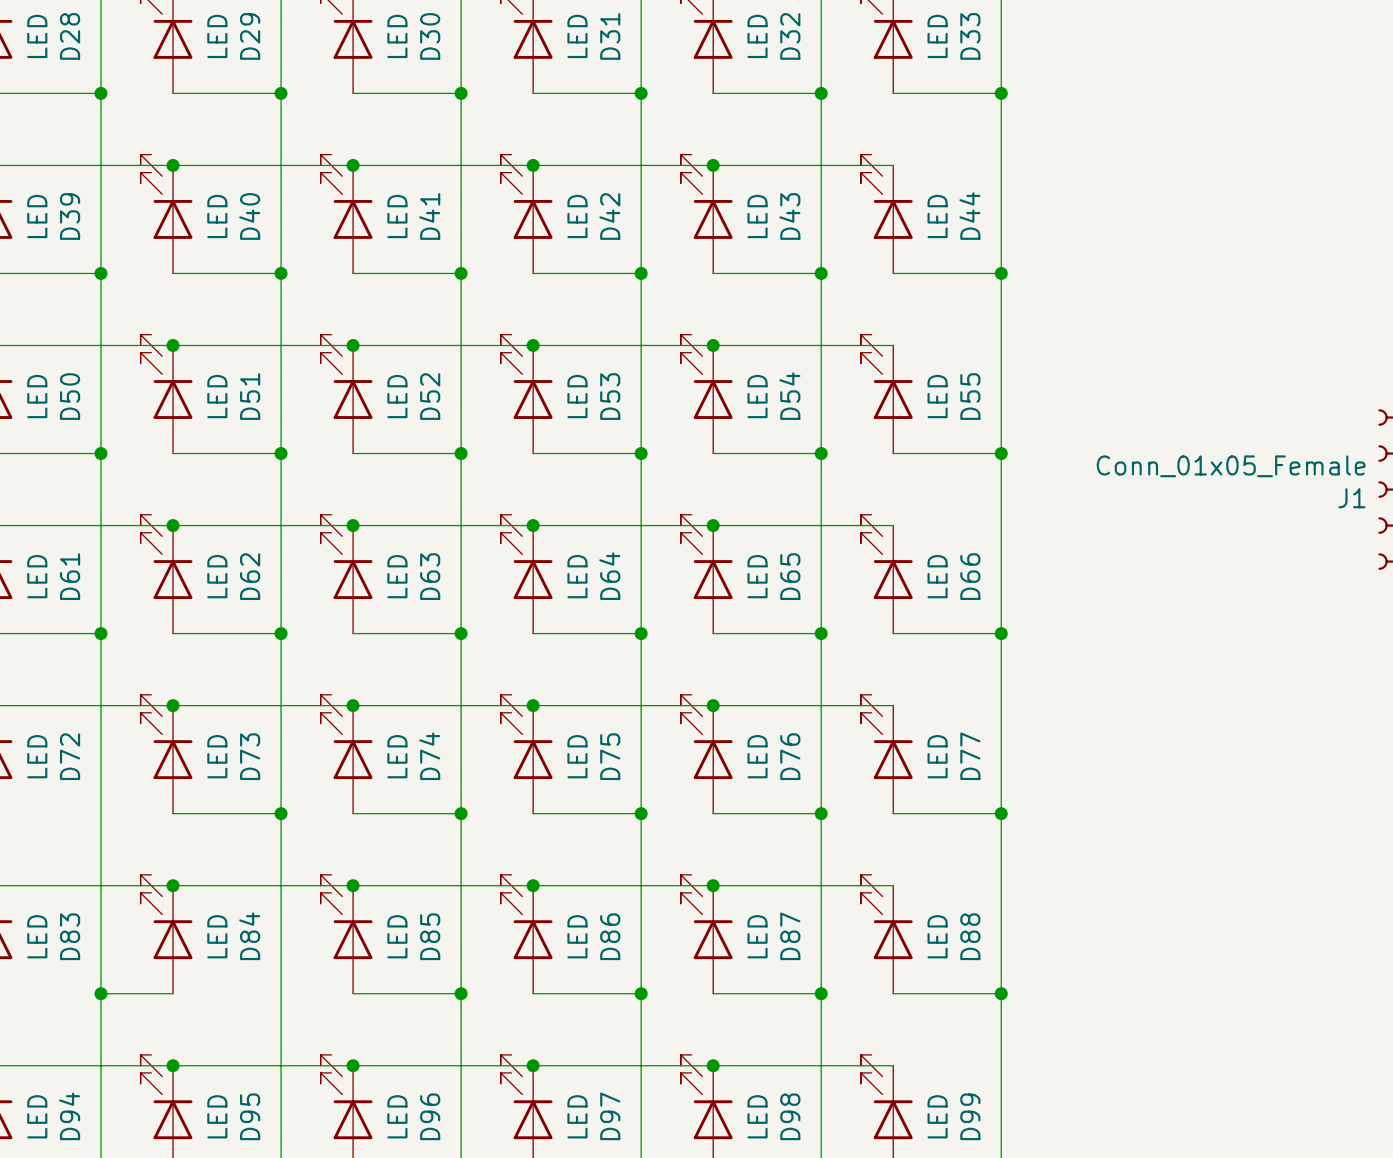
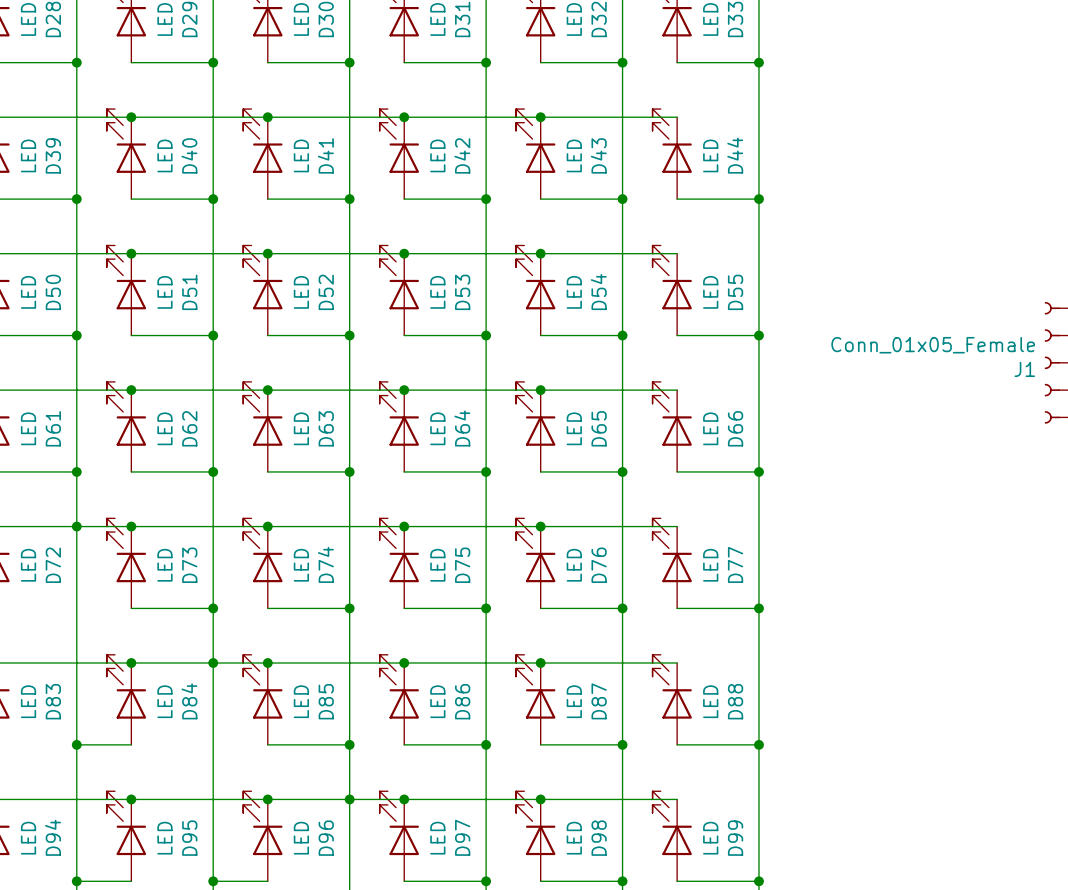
junction: none -> (76, 526)
junction: none -> (213, 663)
junction: none -> (349, 799)

